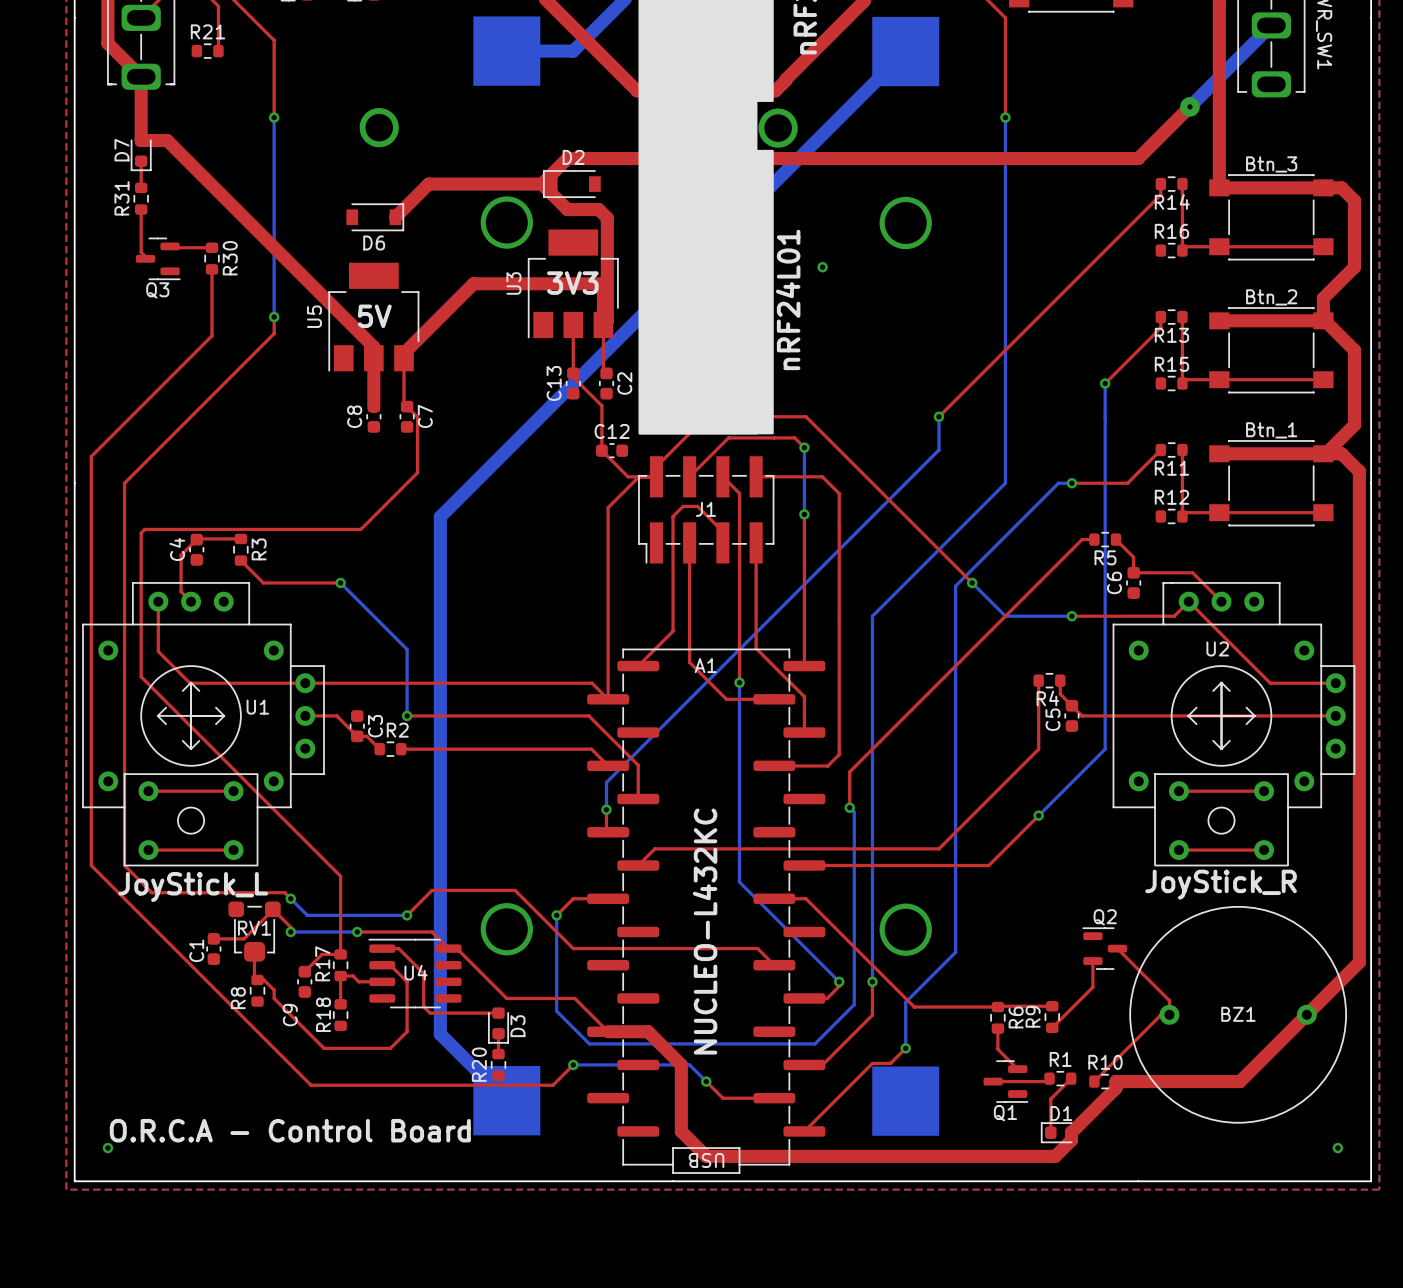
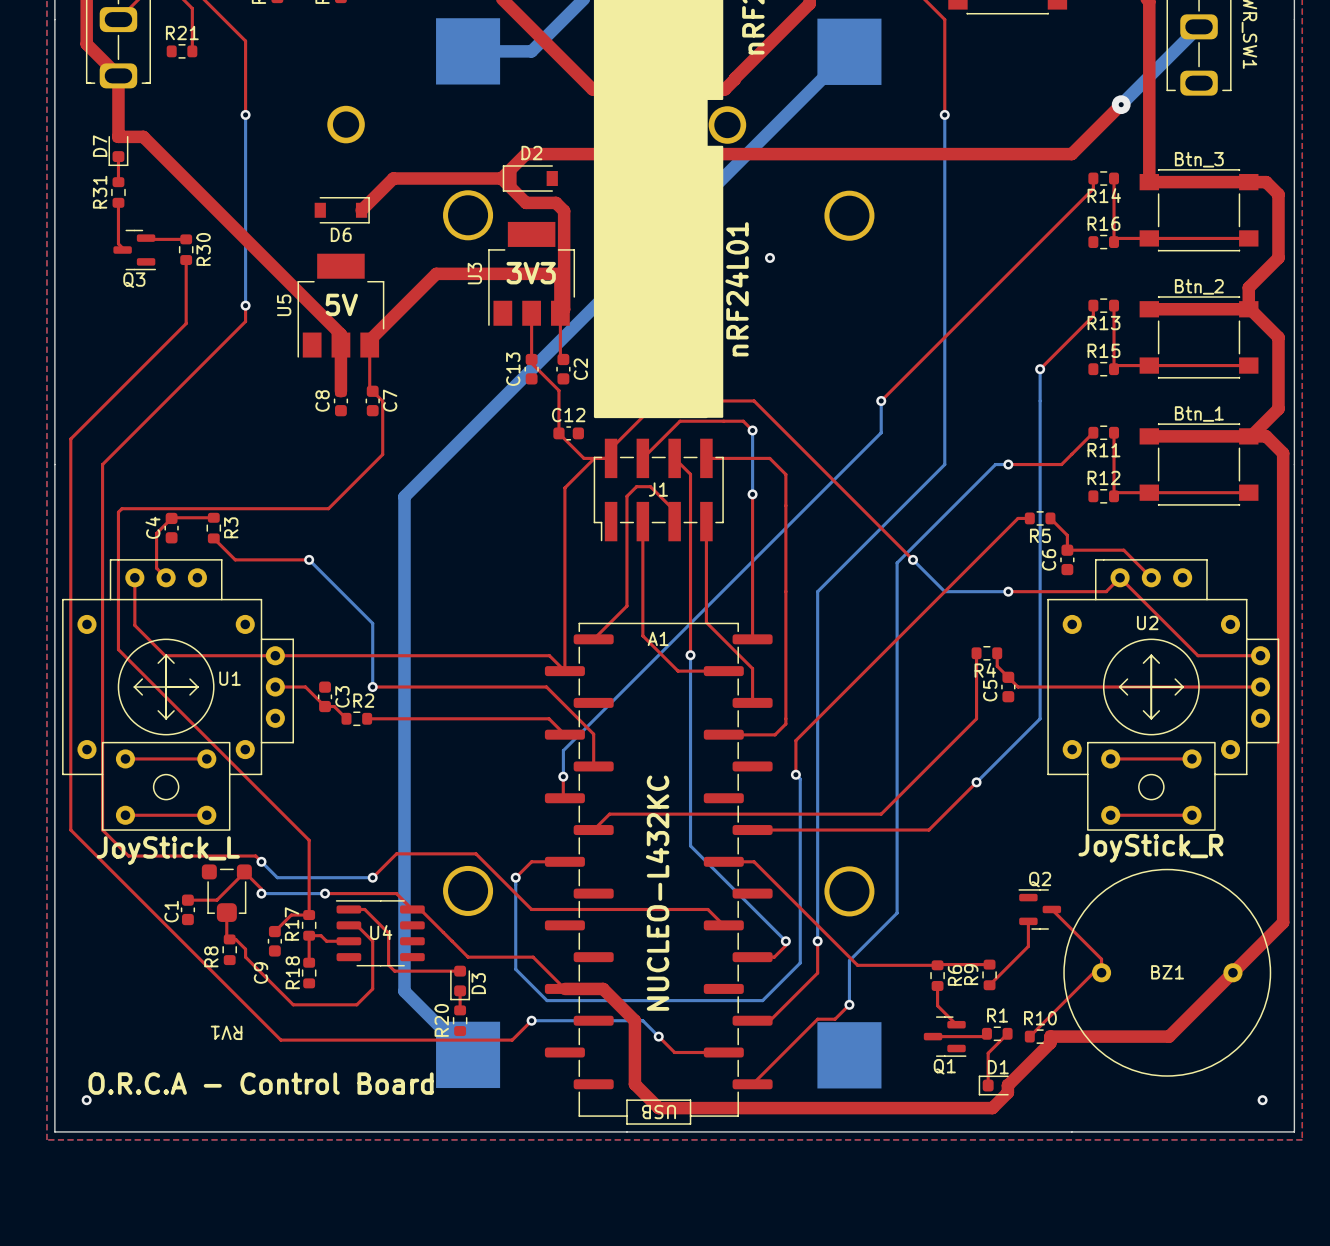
RV1 name rotation: 0° (254, 928) -> 180° (226, 1032)
RV1 name position: RV1 (254, 928) -> RV1 (226, 1032)

